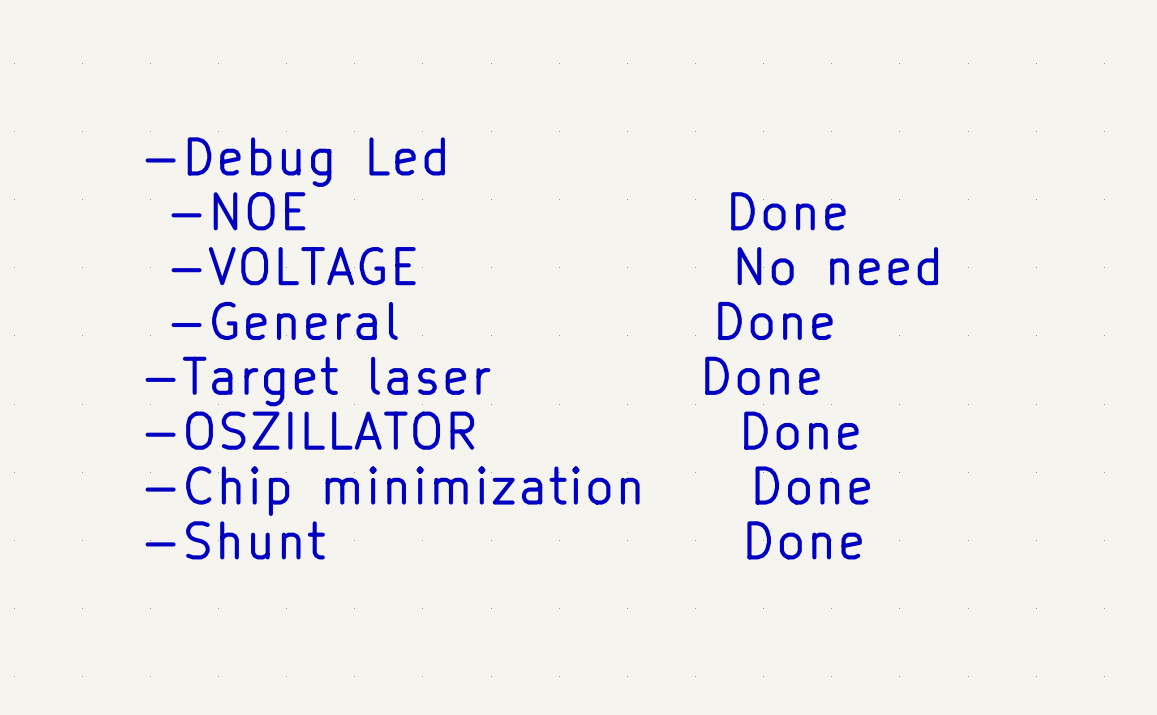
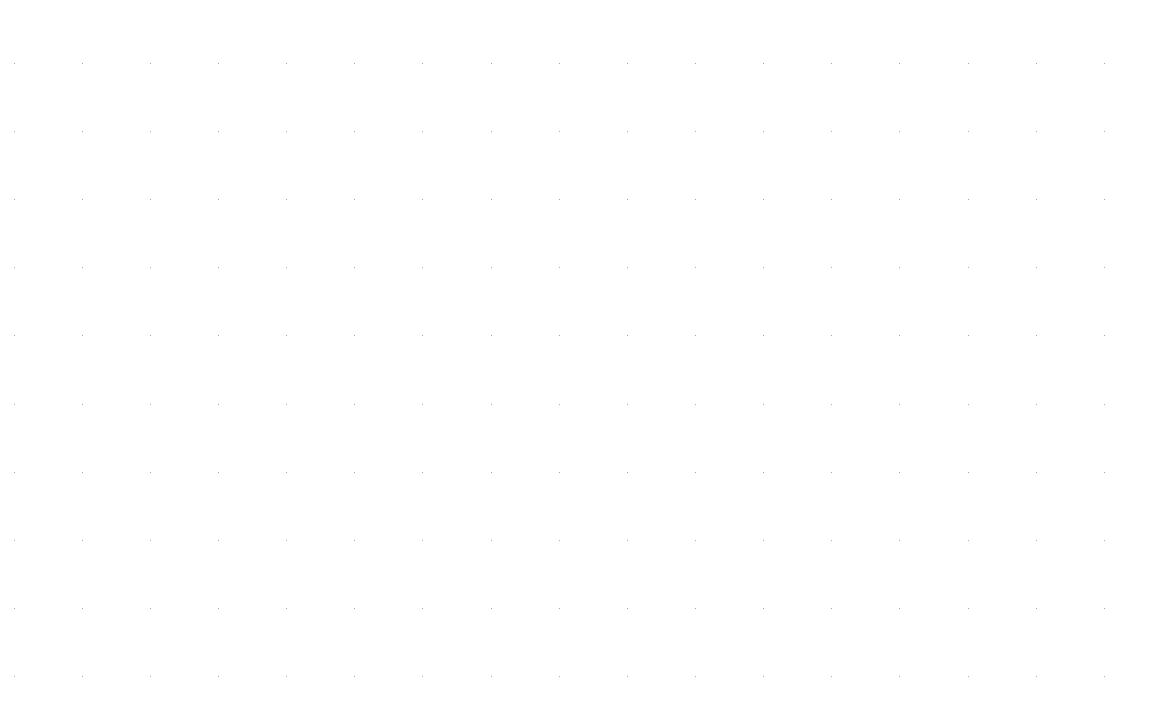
text: -Debug Led (295, 162) -> none
text: -NOE Done (508, 211) -> none
text: -VOLTAGE No need (554, 266) -> none
text: -General Done (502, 320) -> none
text: -Target laser Done (482, 381) -> none
text: -OSZILLATOR Done (502, 430) -> none
text: -Chip minimization Done (507, 491) -> none
text: -Shunt Done (503, 540) -> none

